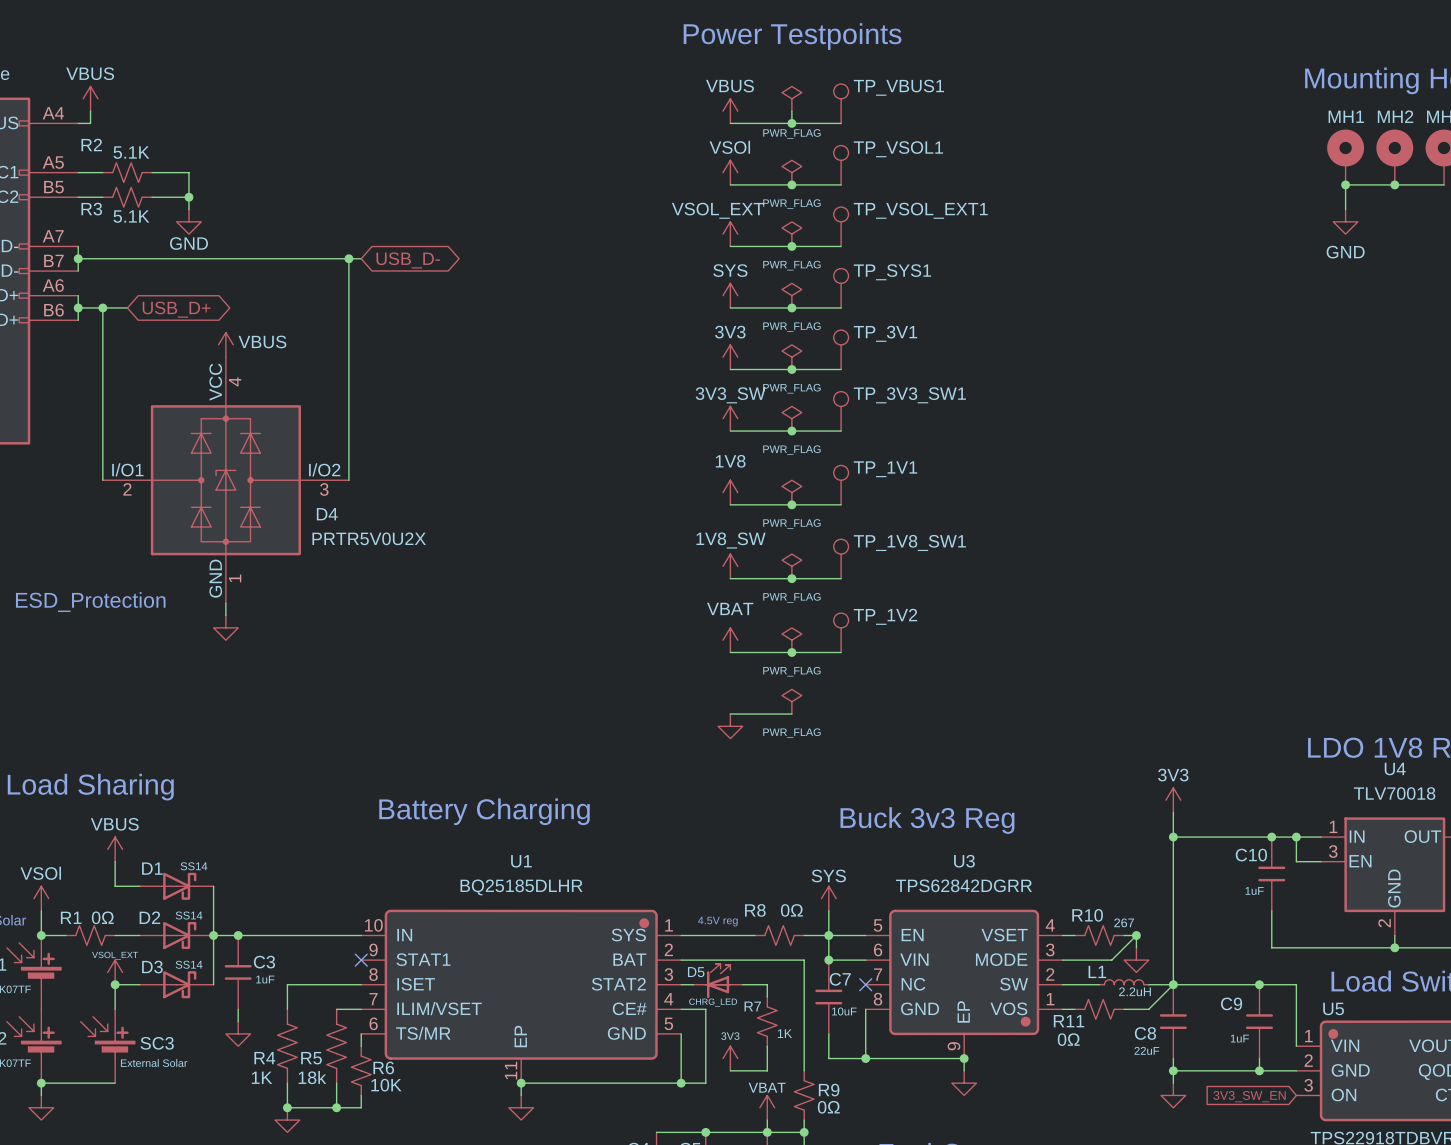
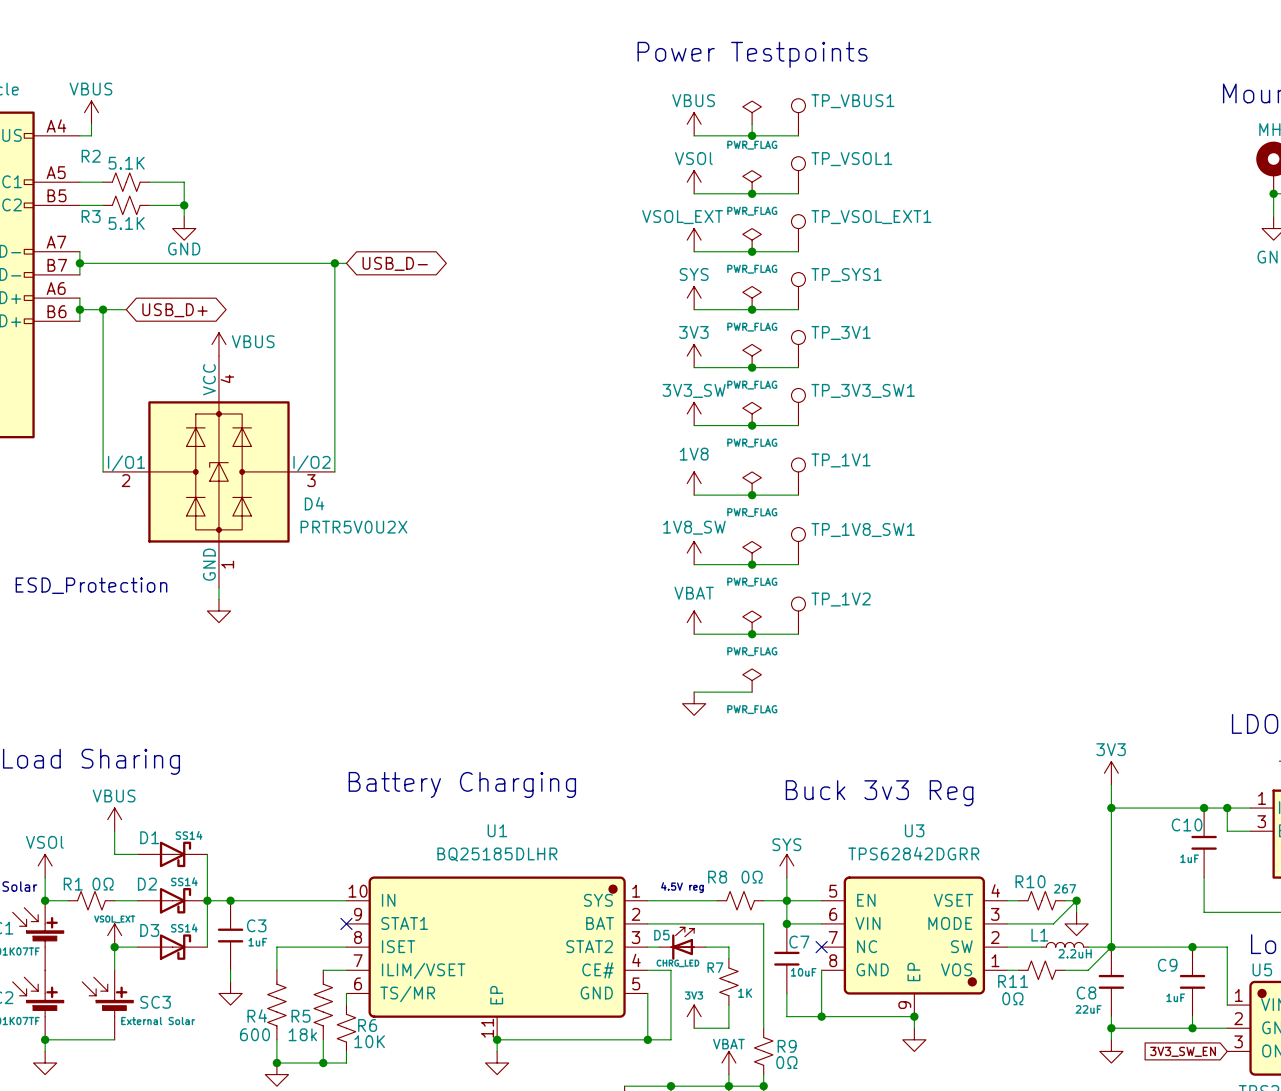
R4 value: 1K (262, 1077) -> 600 (254, 1034)

